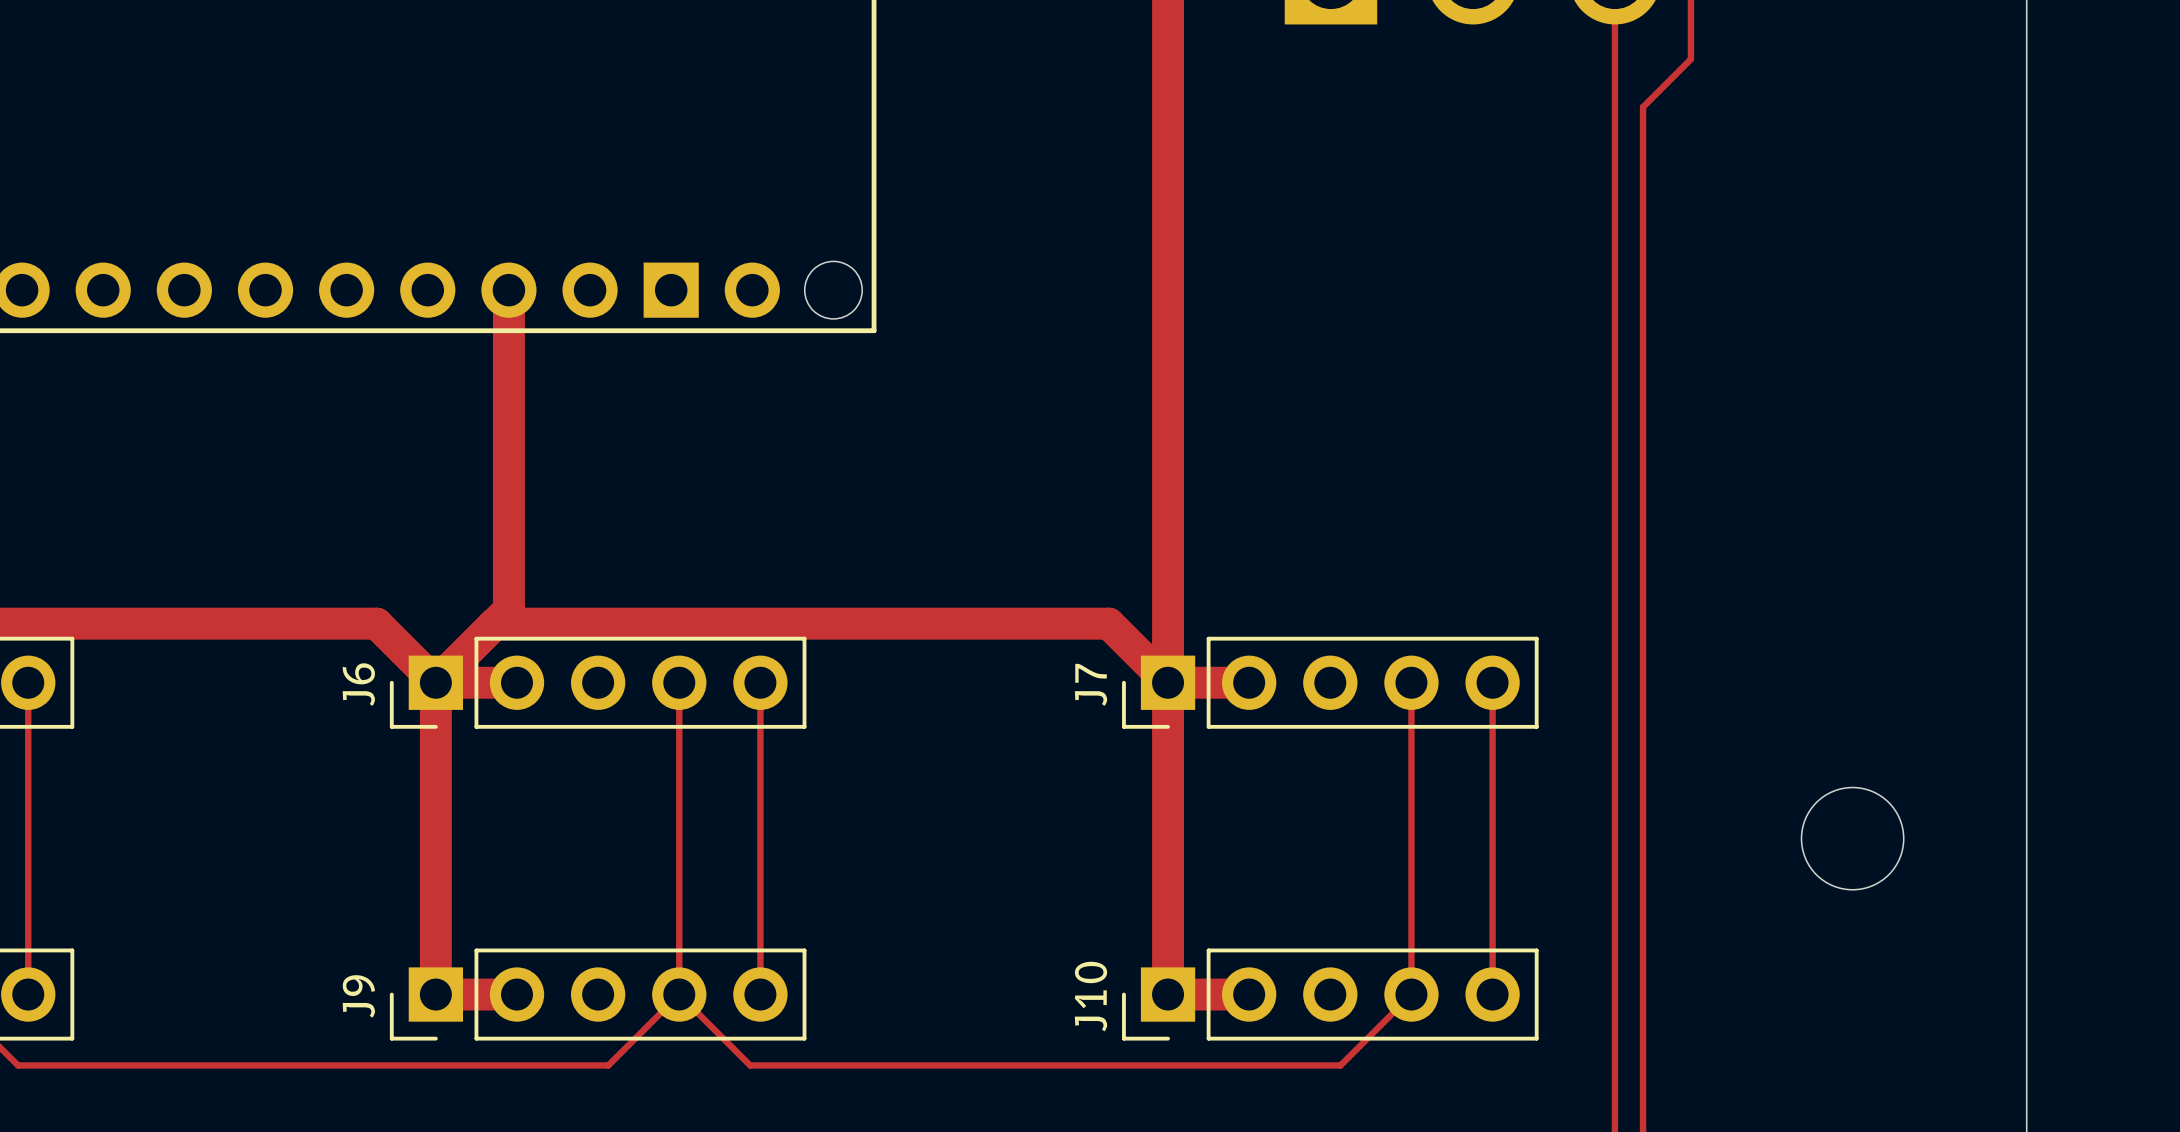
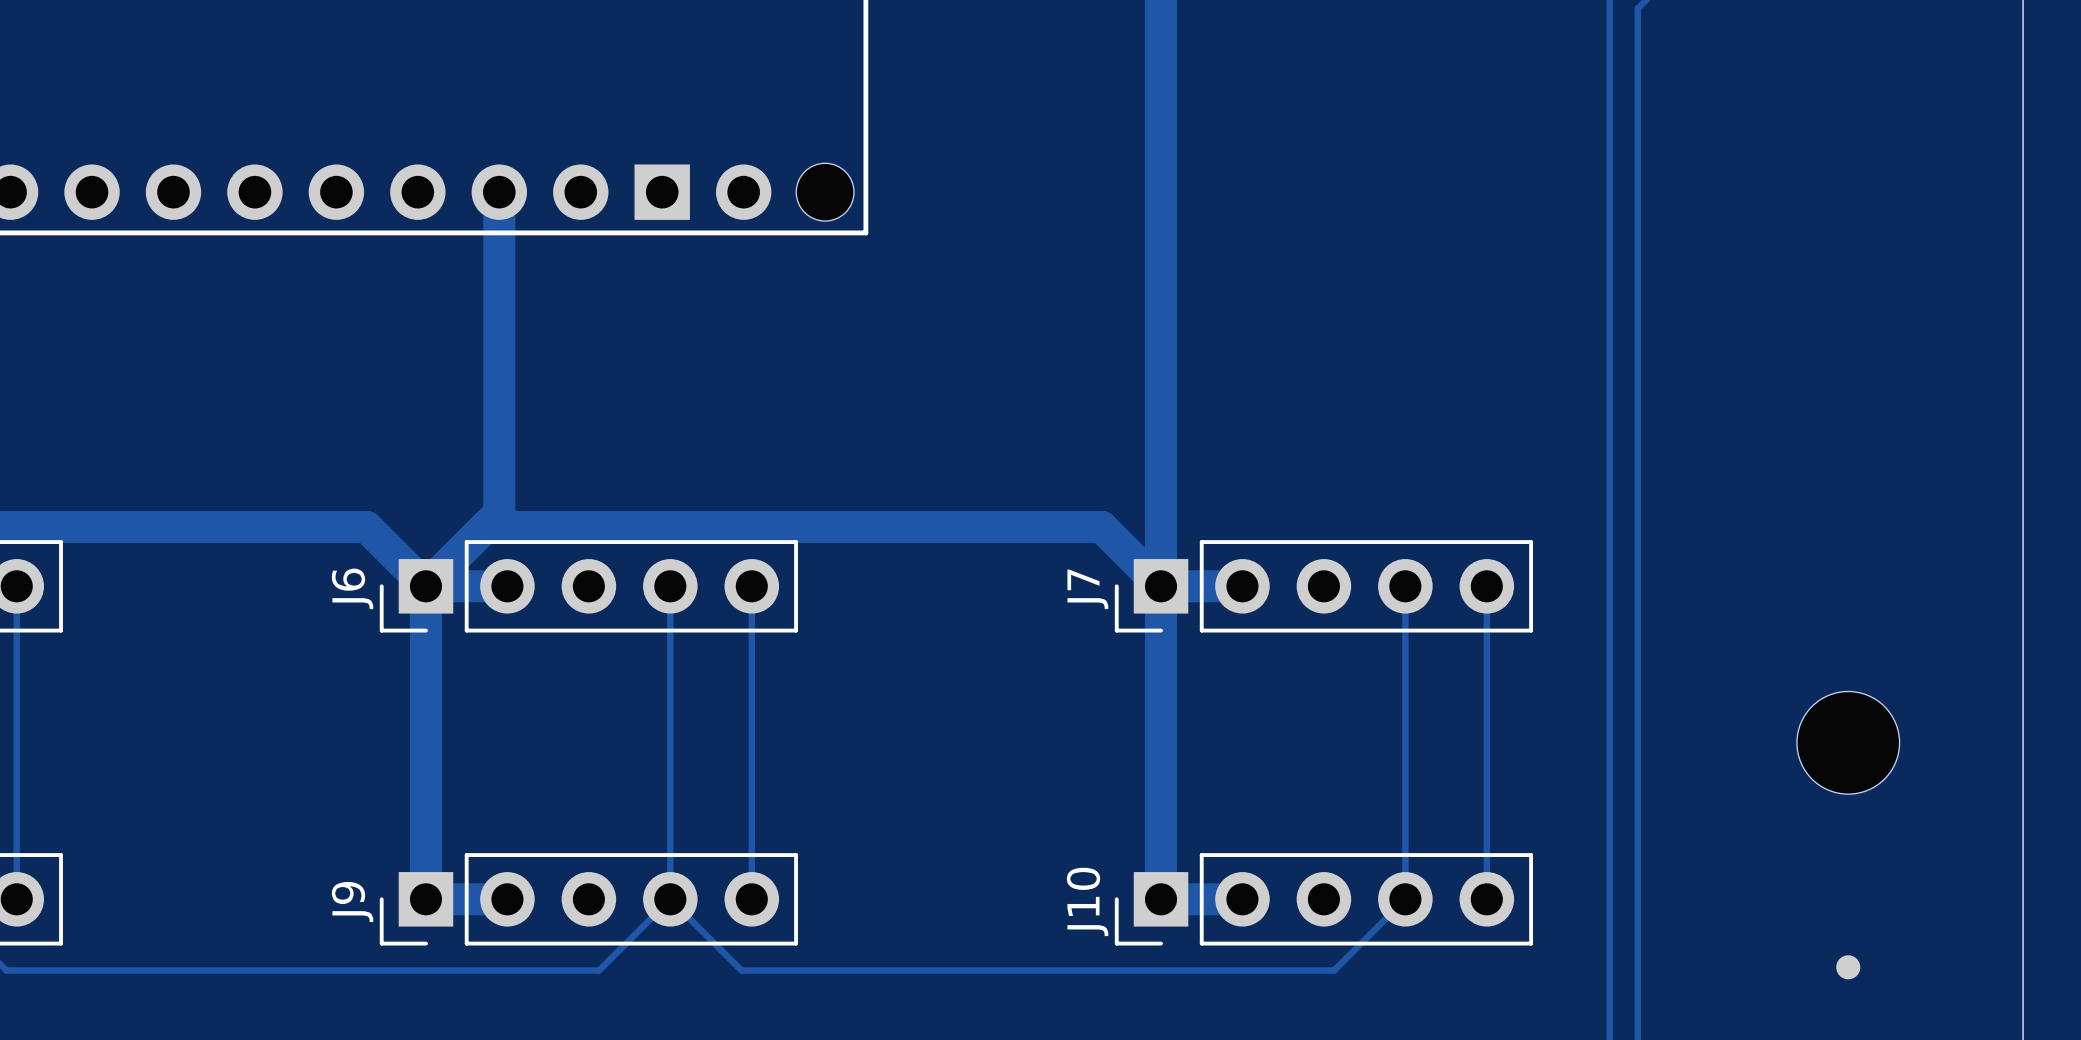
part: none -> (1848, 967)

